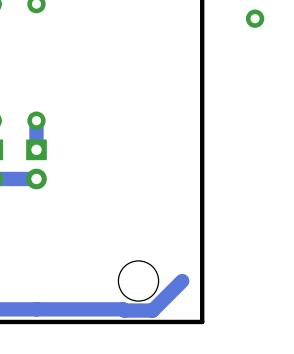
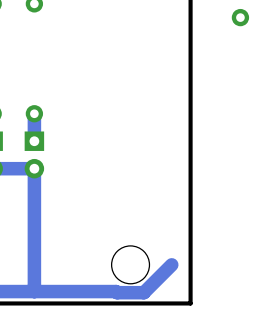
bottom track: none -> (34, 168) (34, 291)

